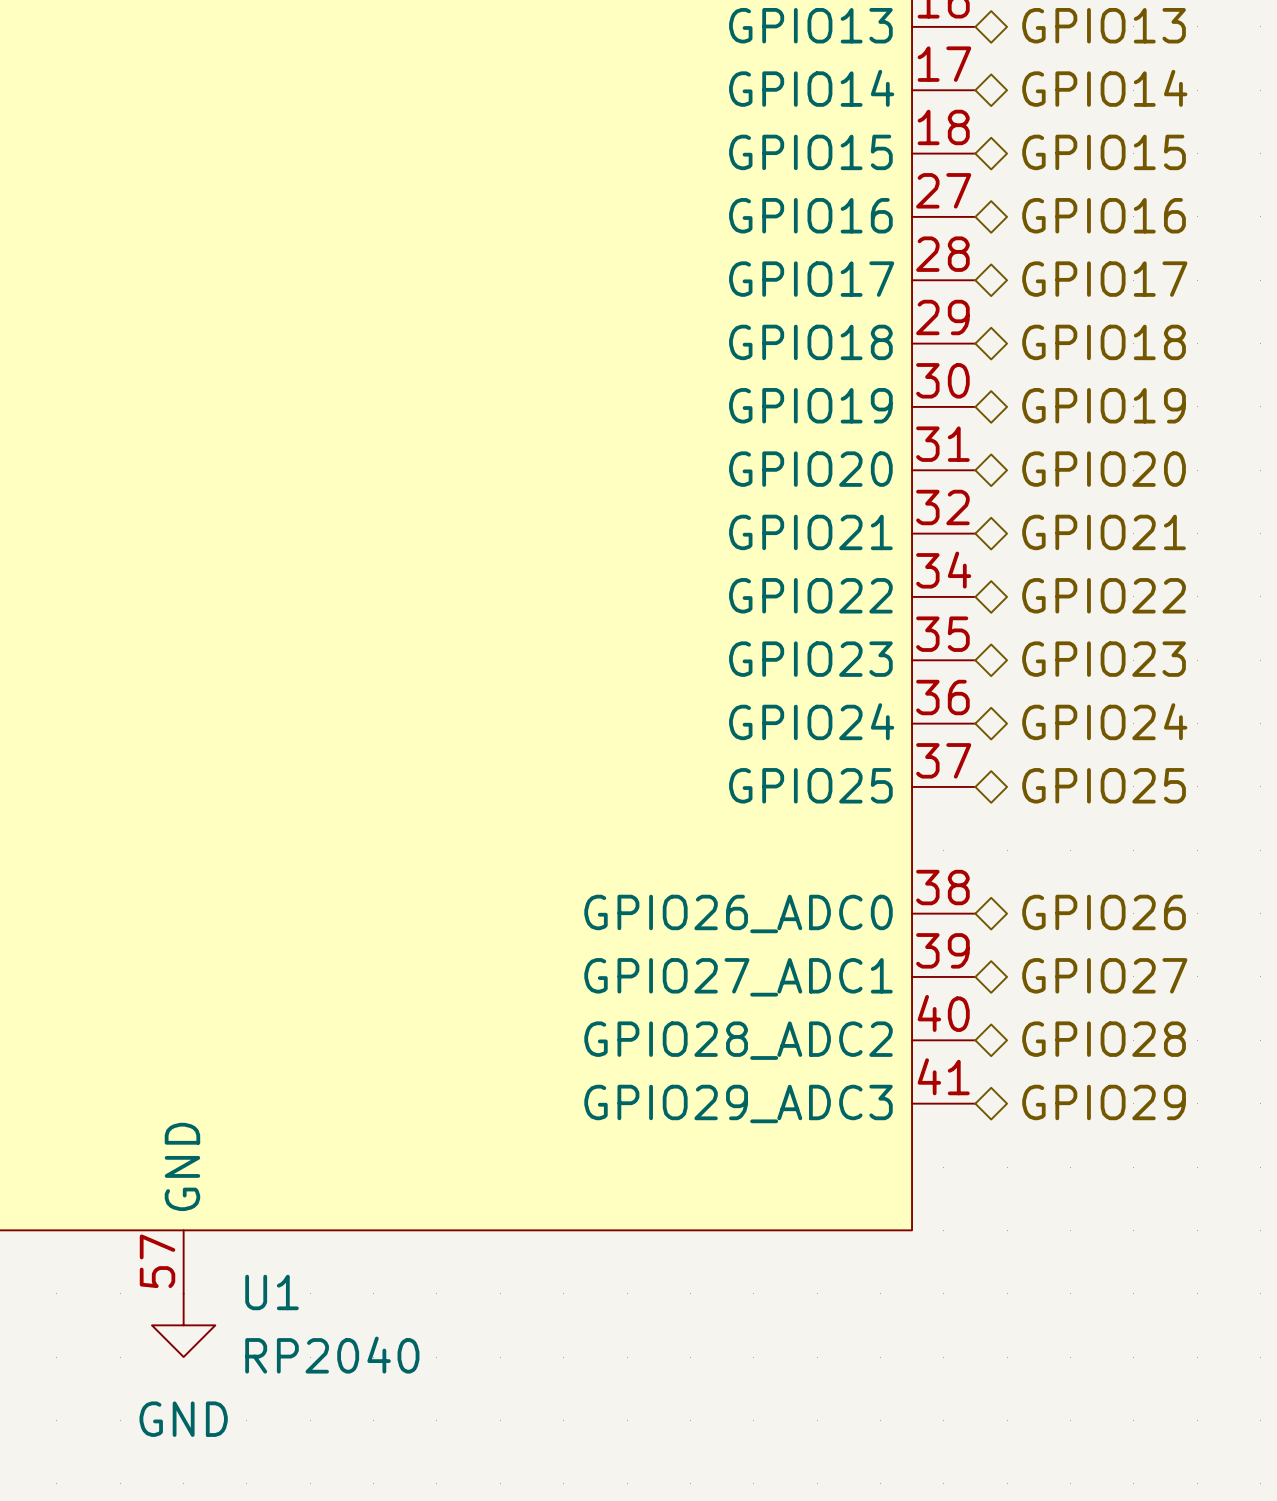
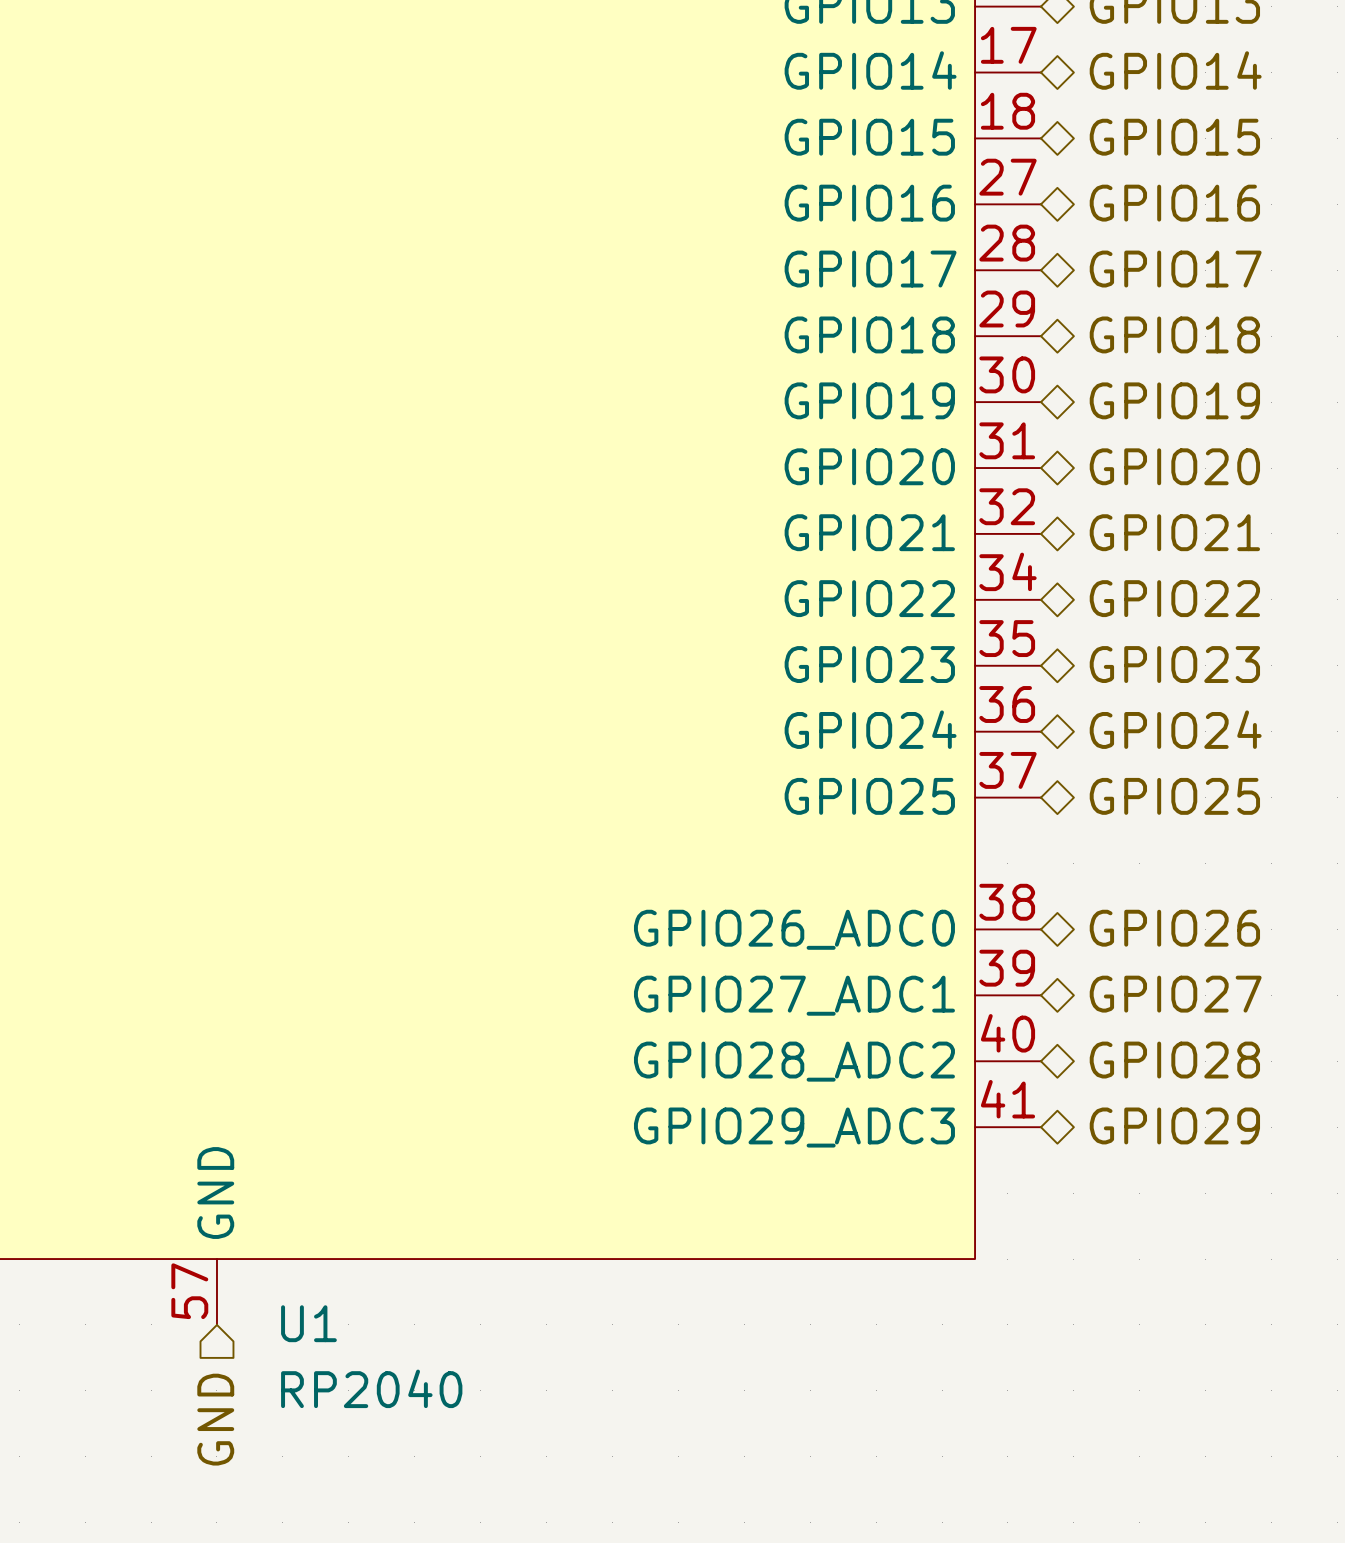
power symbol: GND (183, 1325) -> none
hierarchical label: none -> GND (215, 1419)

